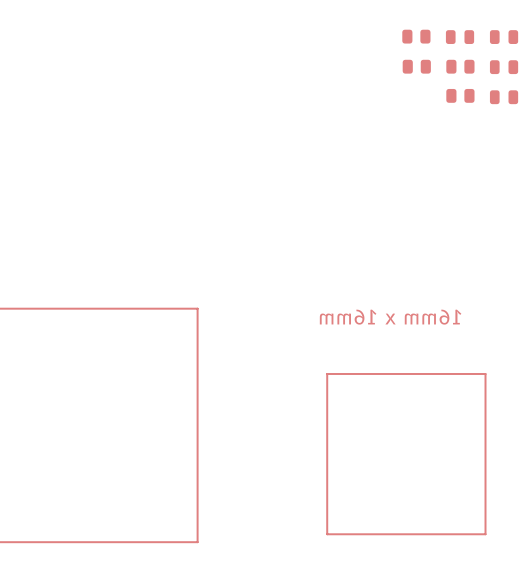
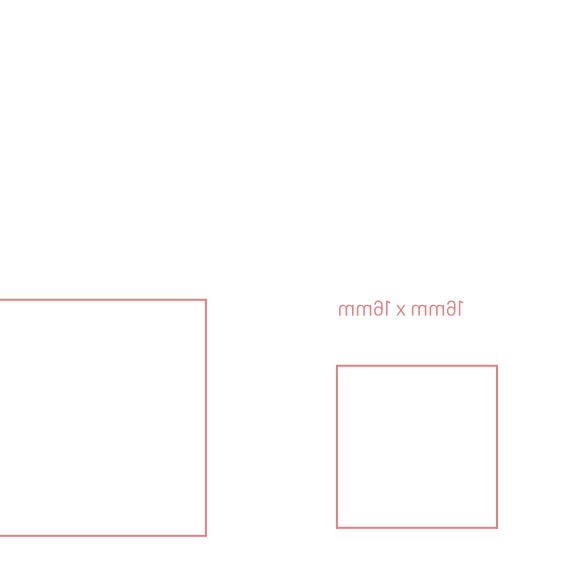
part: (416, 36) -> none
part: (460, 37) -> none
part: (504, 37) -> none
part: (416, 66) -> none
part: (460, 66) -> none
part: (504, 67) -> none
part: (460, 95) -> none
part: (504, 97) -> none

